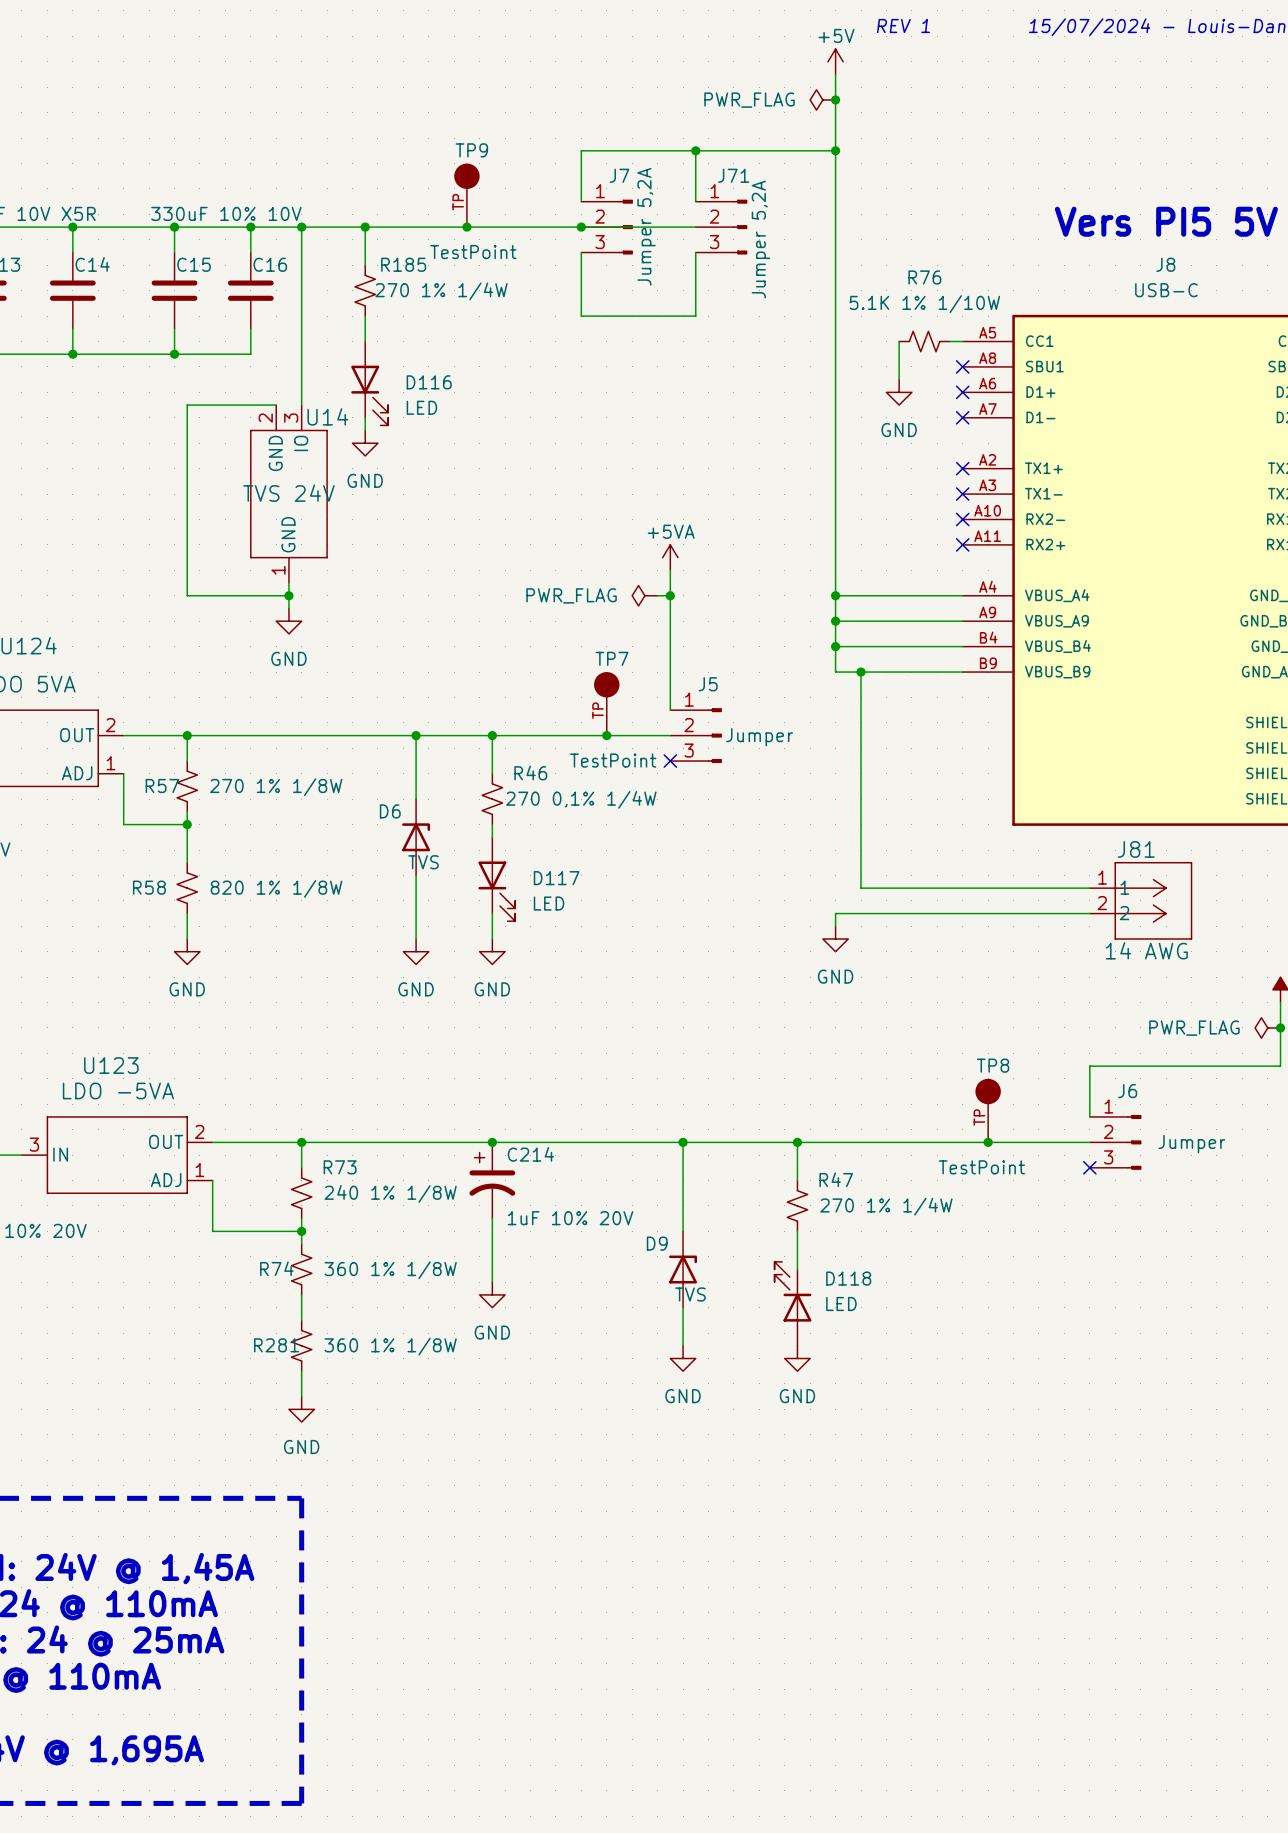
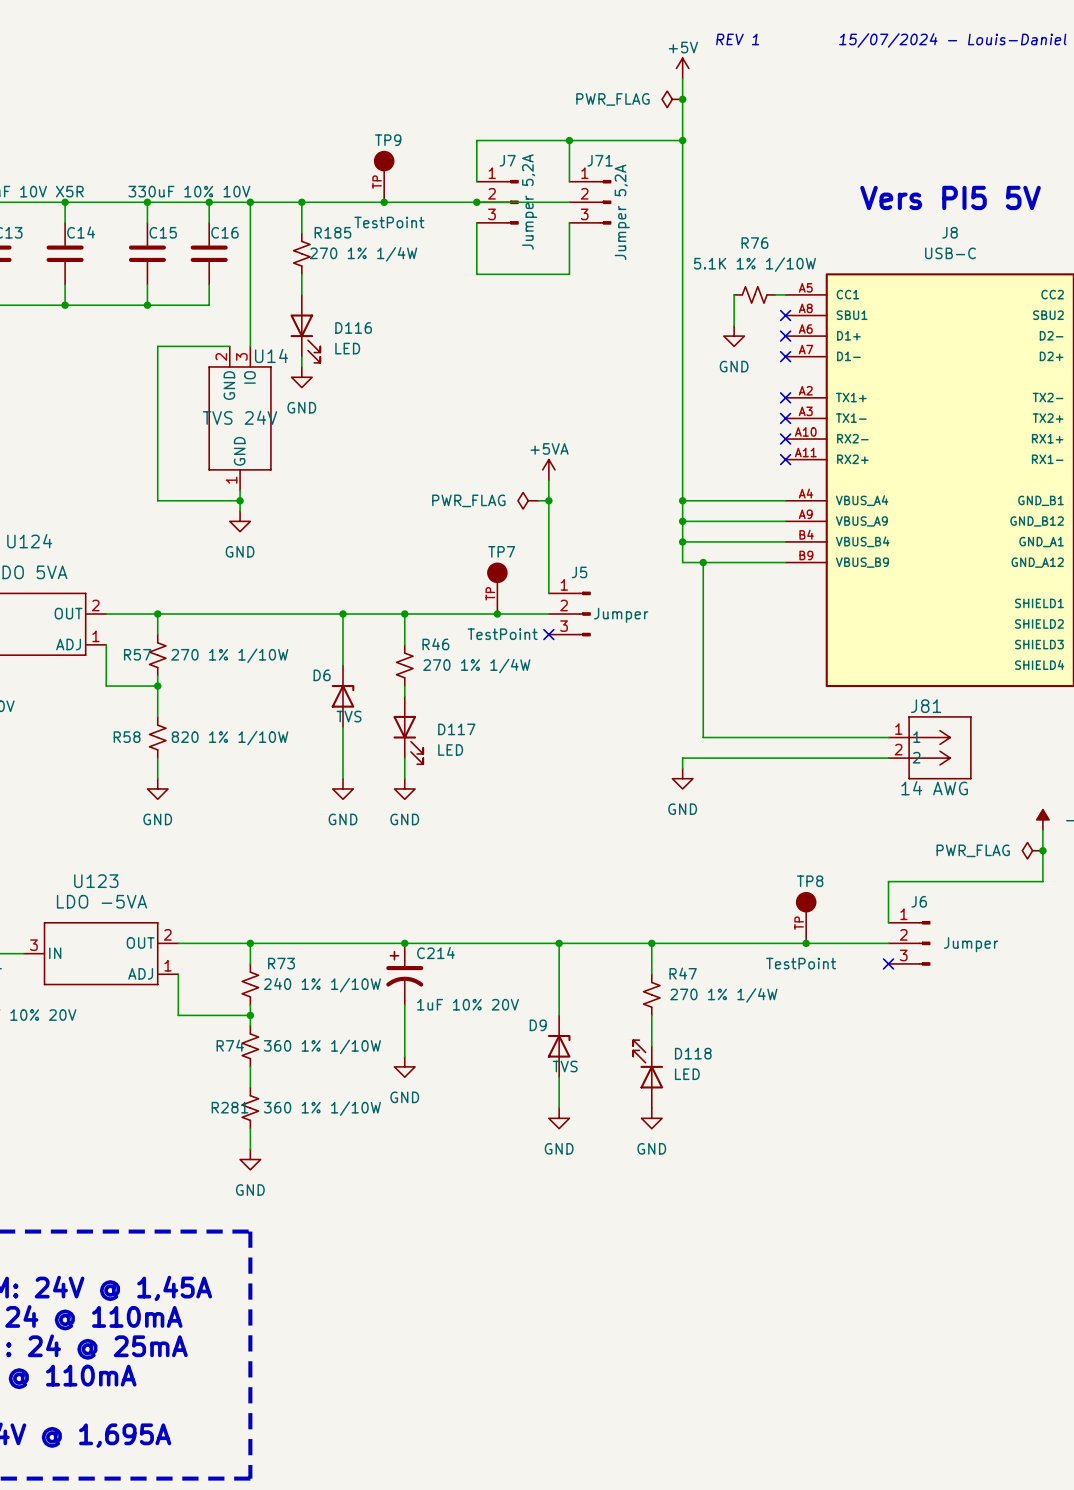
R57 value: 270 1% 1/8W (276, 787) -> 270 1% 1/10W (229, 655)
R46 value: 270 0,1% 1/4W (581, 799) -> 270 1% 1/4W (476, 666)
R58 value: 820 1% 1/8W (276, 888) -> 820 1% 1/10W (230, 738)
R73 value: 240 1% 1/8W (390, 1193) -> 240 1% 1/10W (322, 985)
R74 value: 360 1% 1/8W (390, 1270) -> 360 1% 1/10W (322, 1046)
R281 value: 360 1% 1/8W (390, 1346) -> 360 1% 1/10W (322, 1108)

